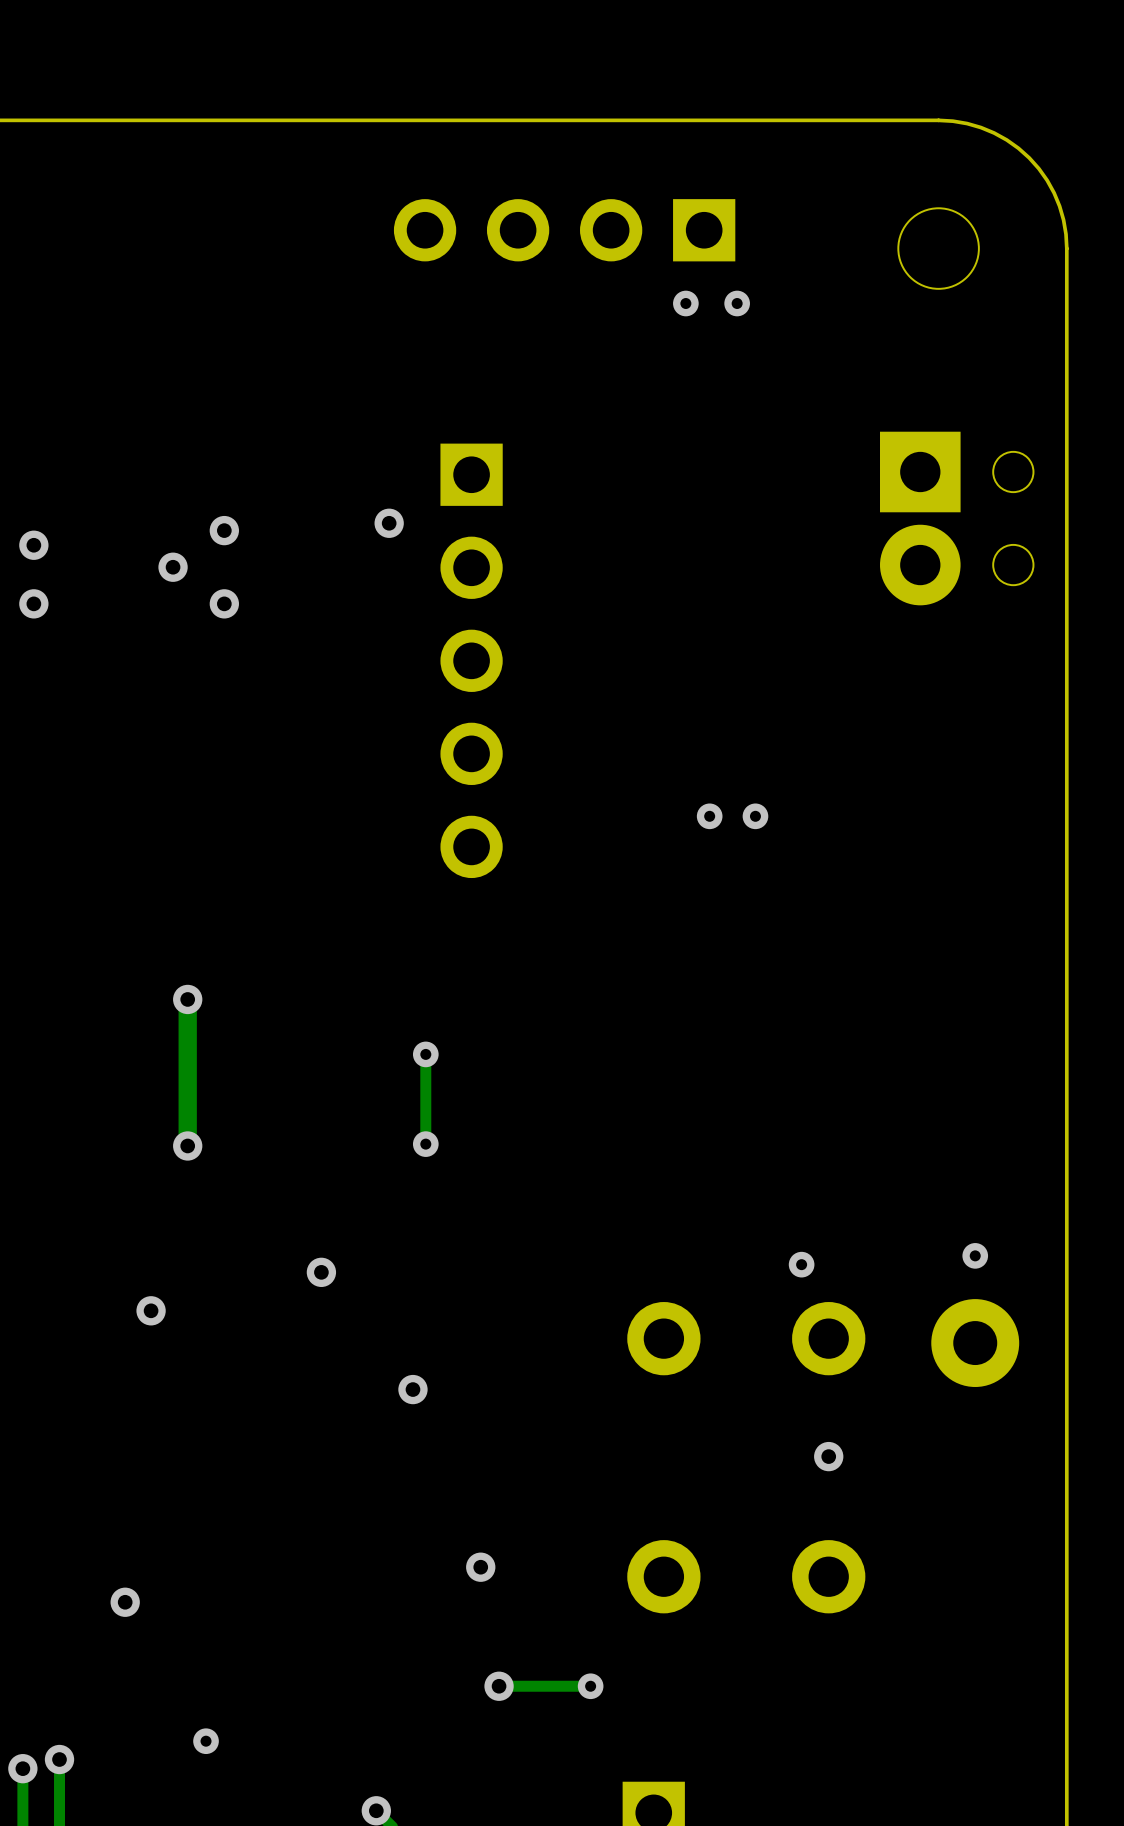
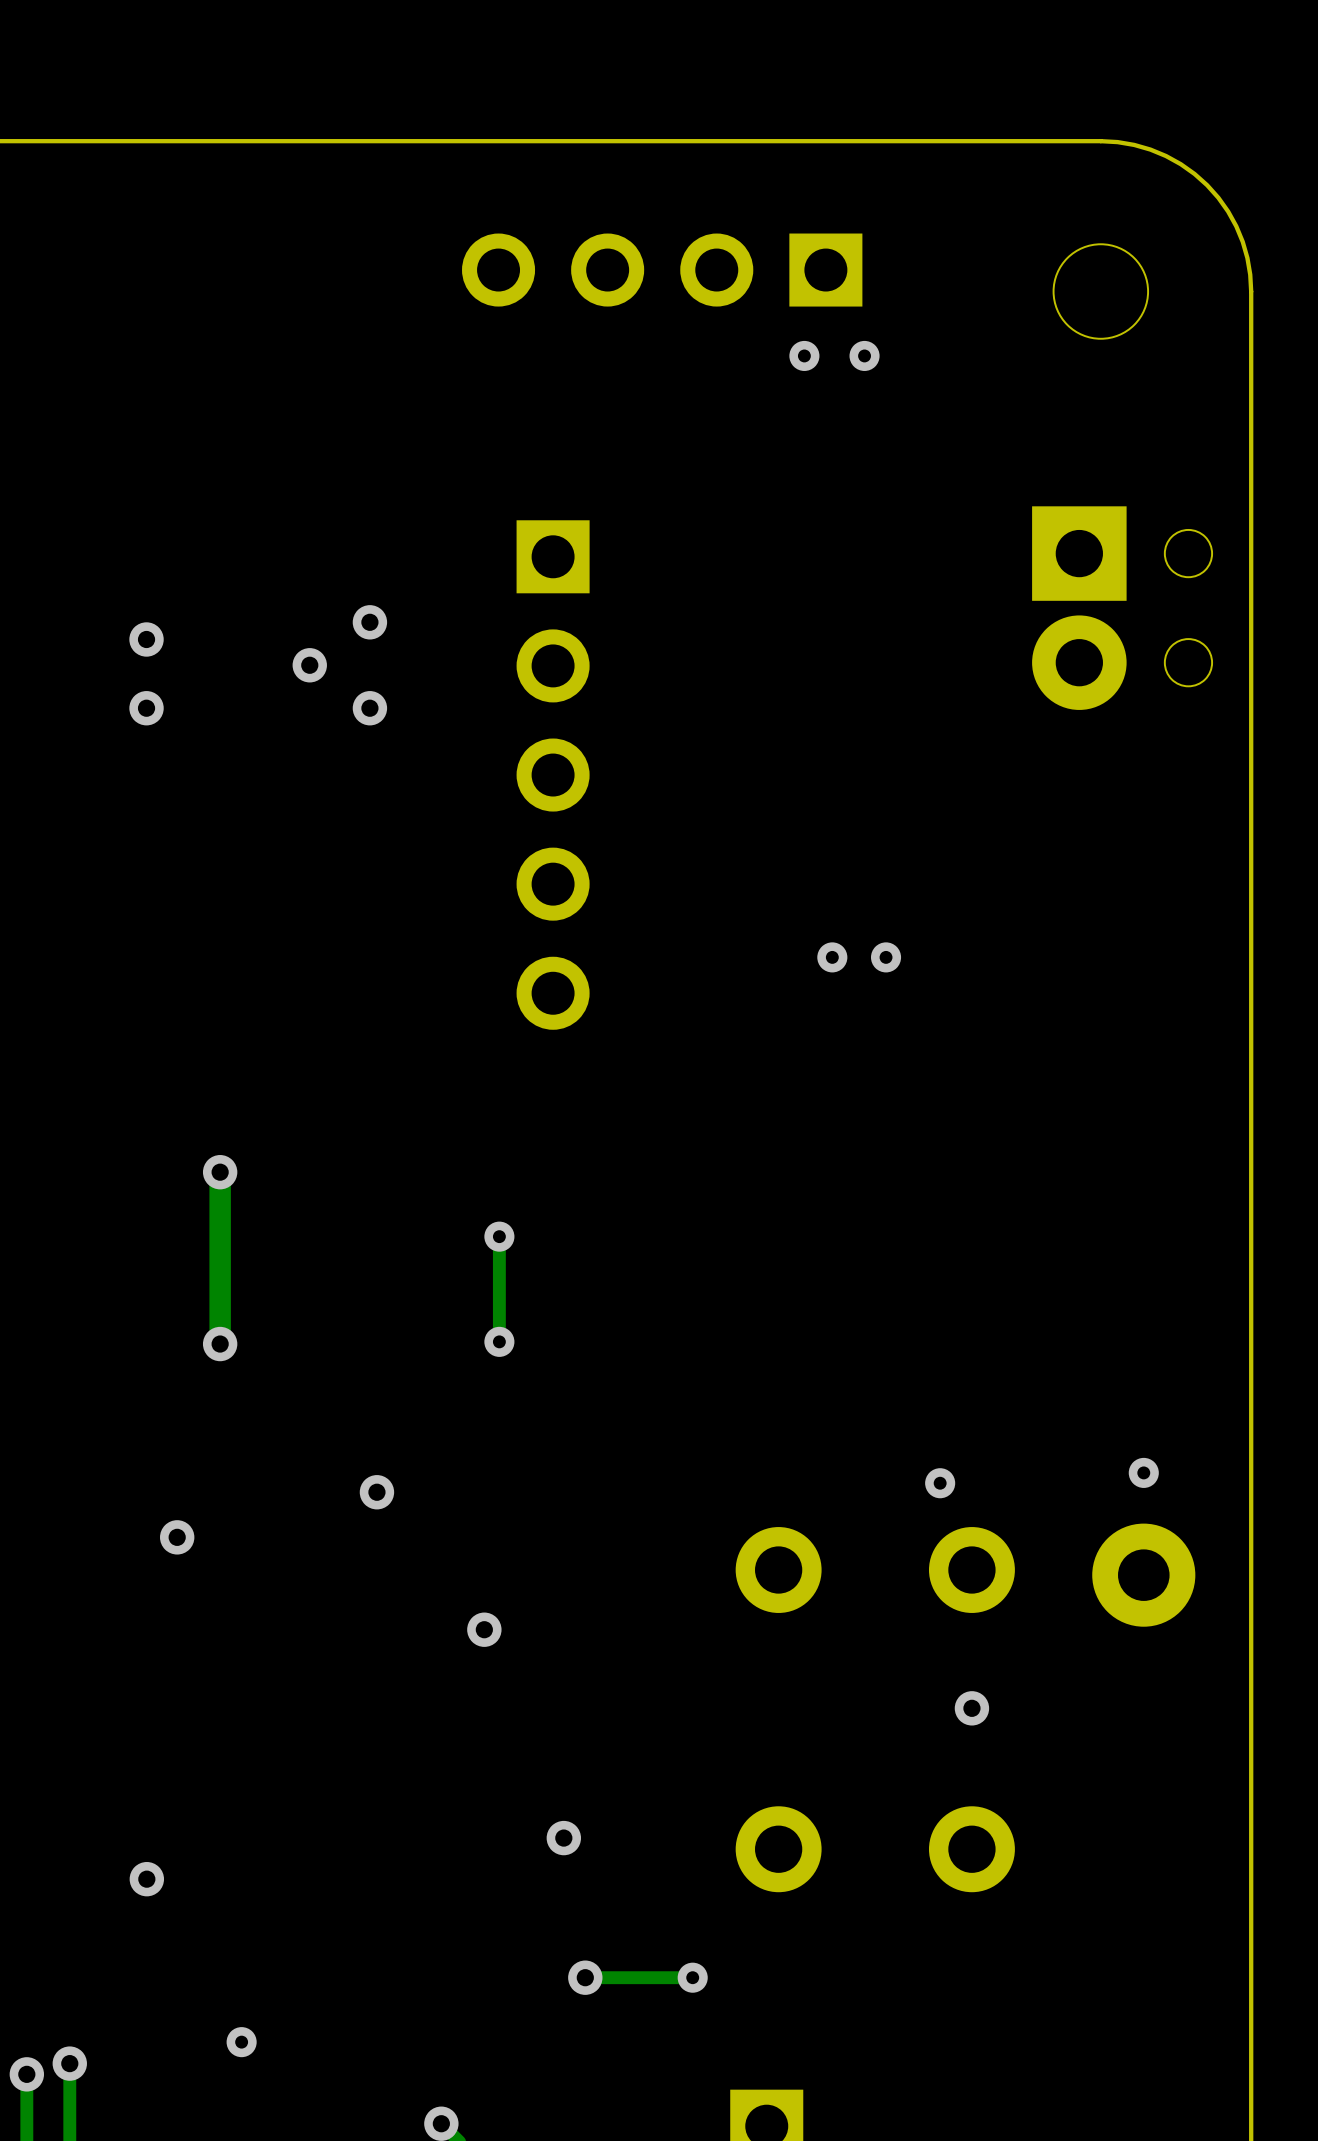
via: (389, 523) -> none
via: (224, 530) -> none
via: none -> (369, 622)
via: (33, 545) -> none
via: none -> (146, 639)
via: (173, 567) -> none
via: none -> (309, 665)
via: (33, 603) -> none
via: none -> (146, 708)
via: (224, 603) -> none
via: none -> (369, 708)

